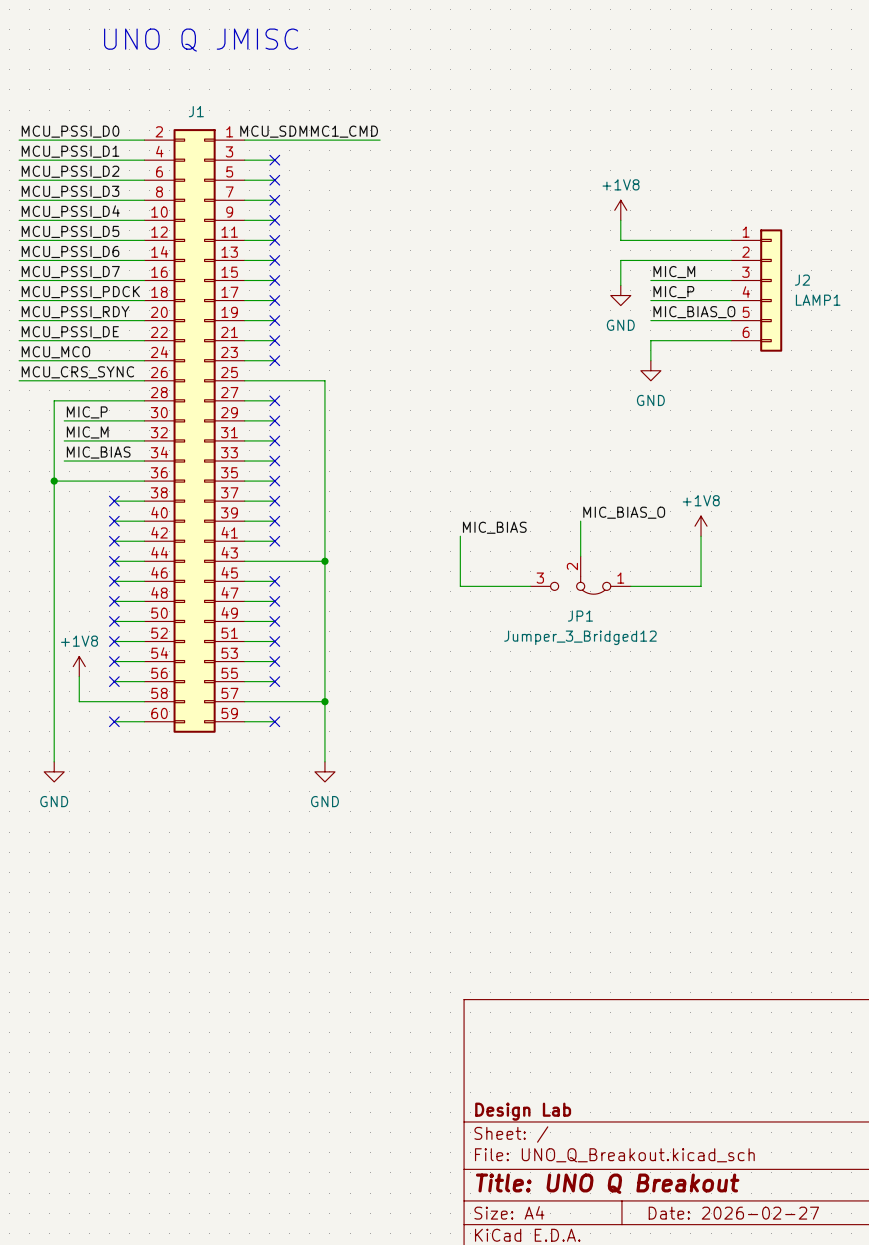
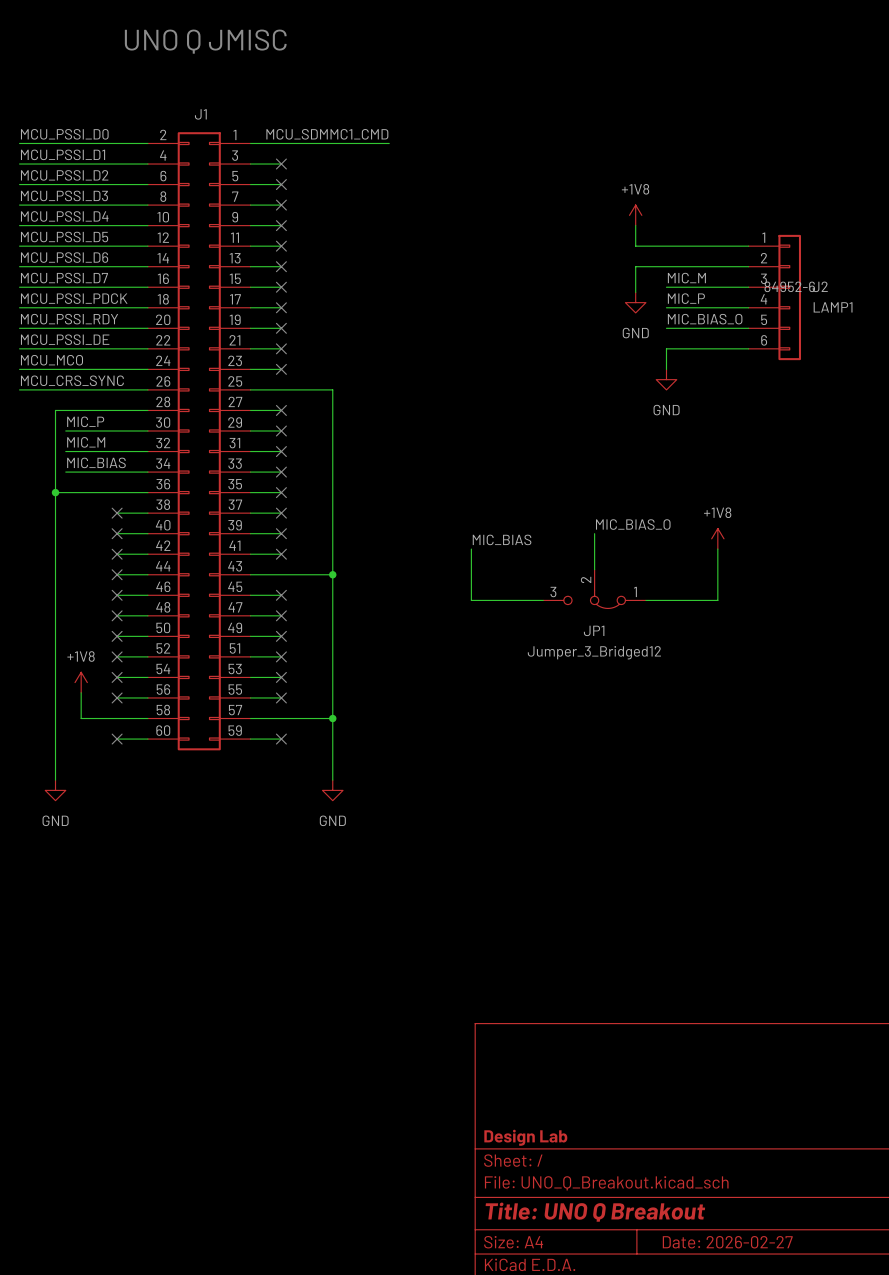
J2 text: none -> 84952-6 (789, 286)

